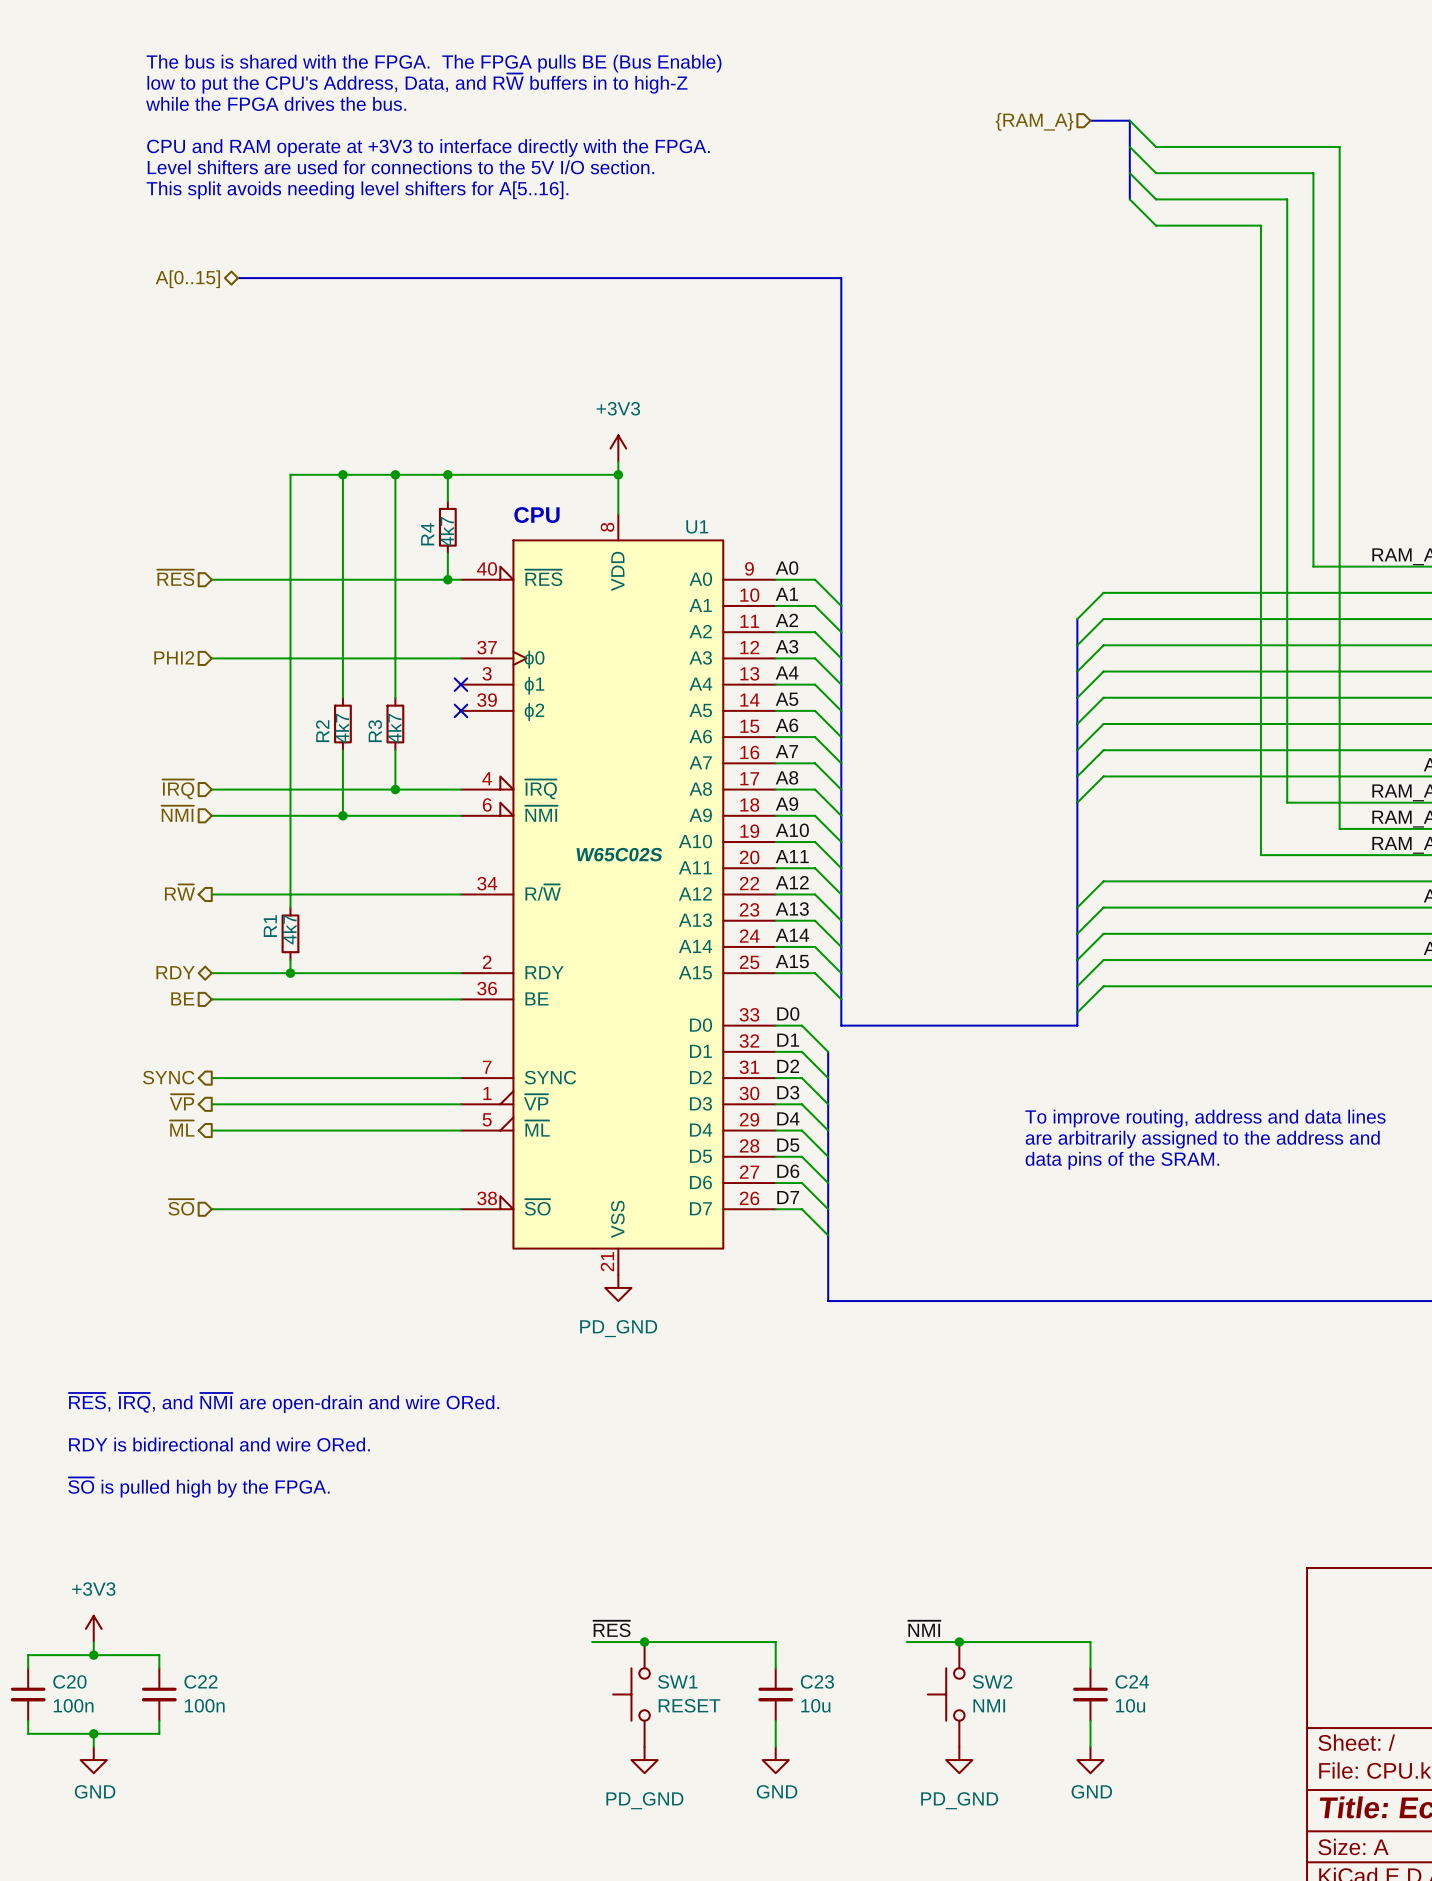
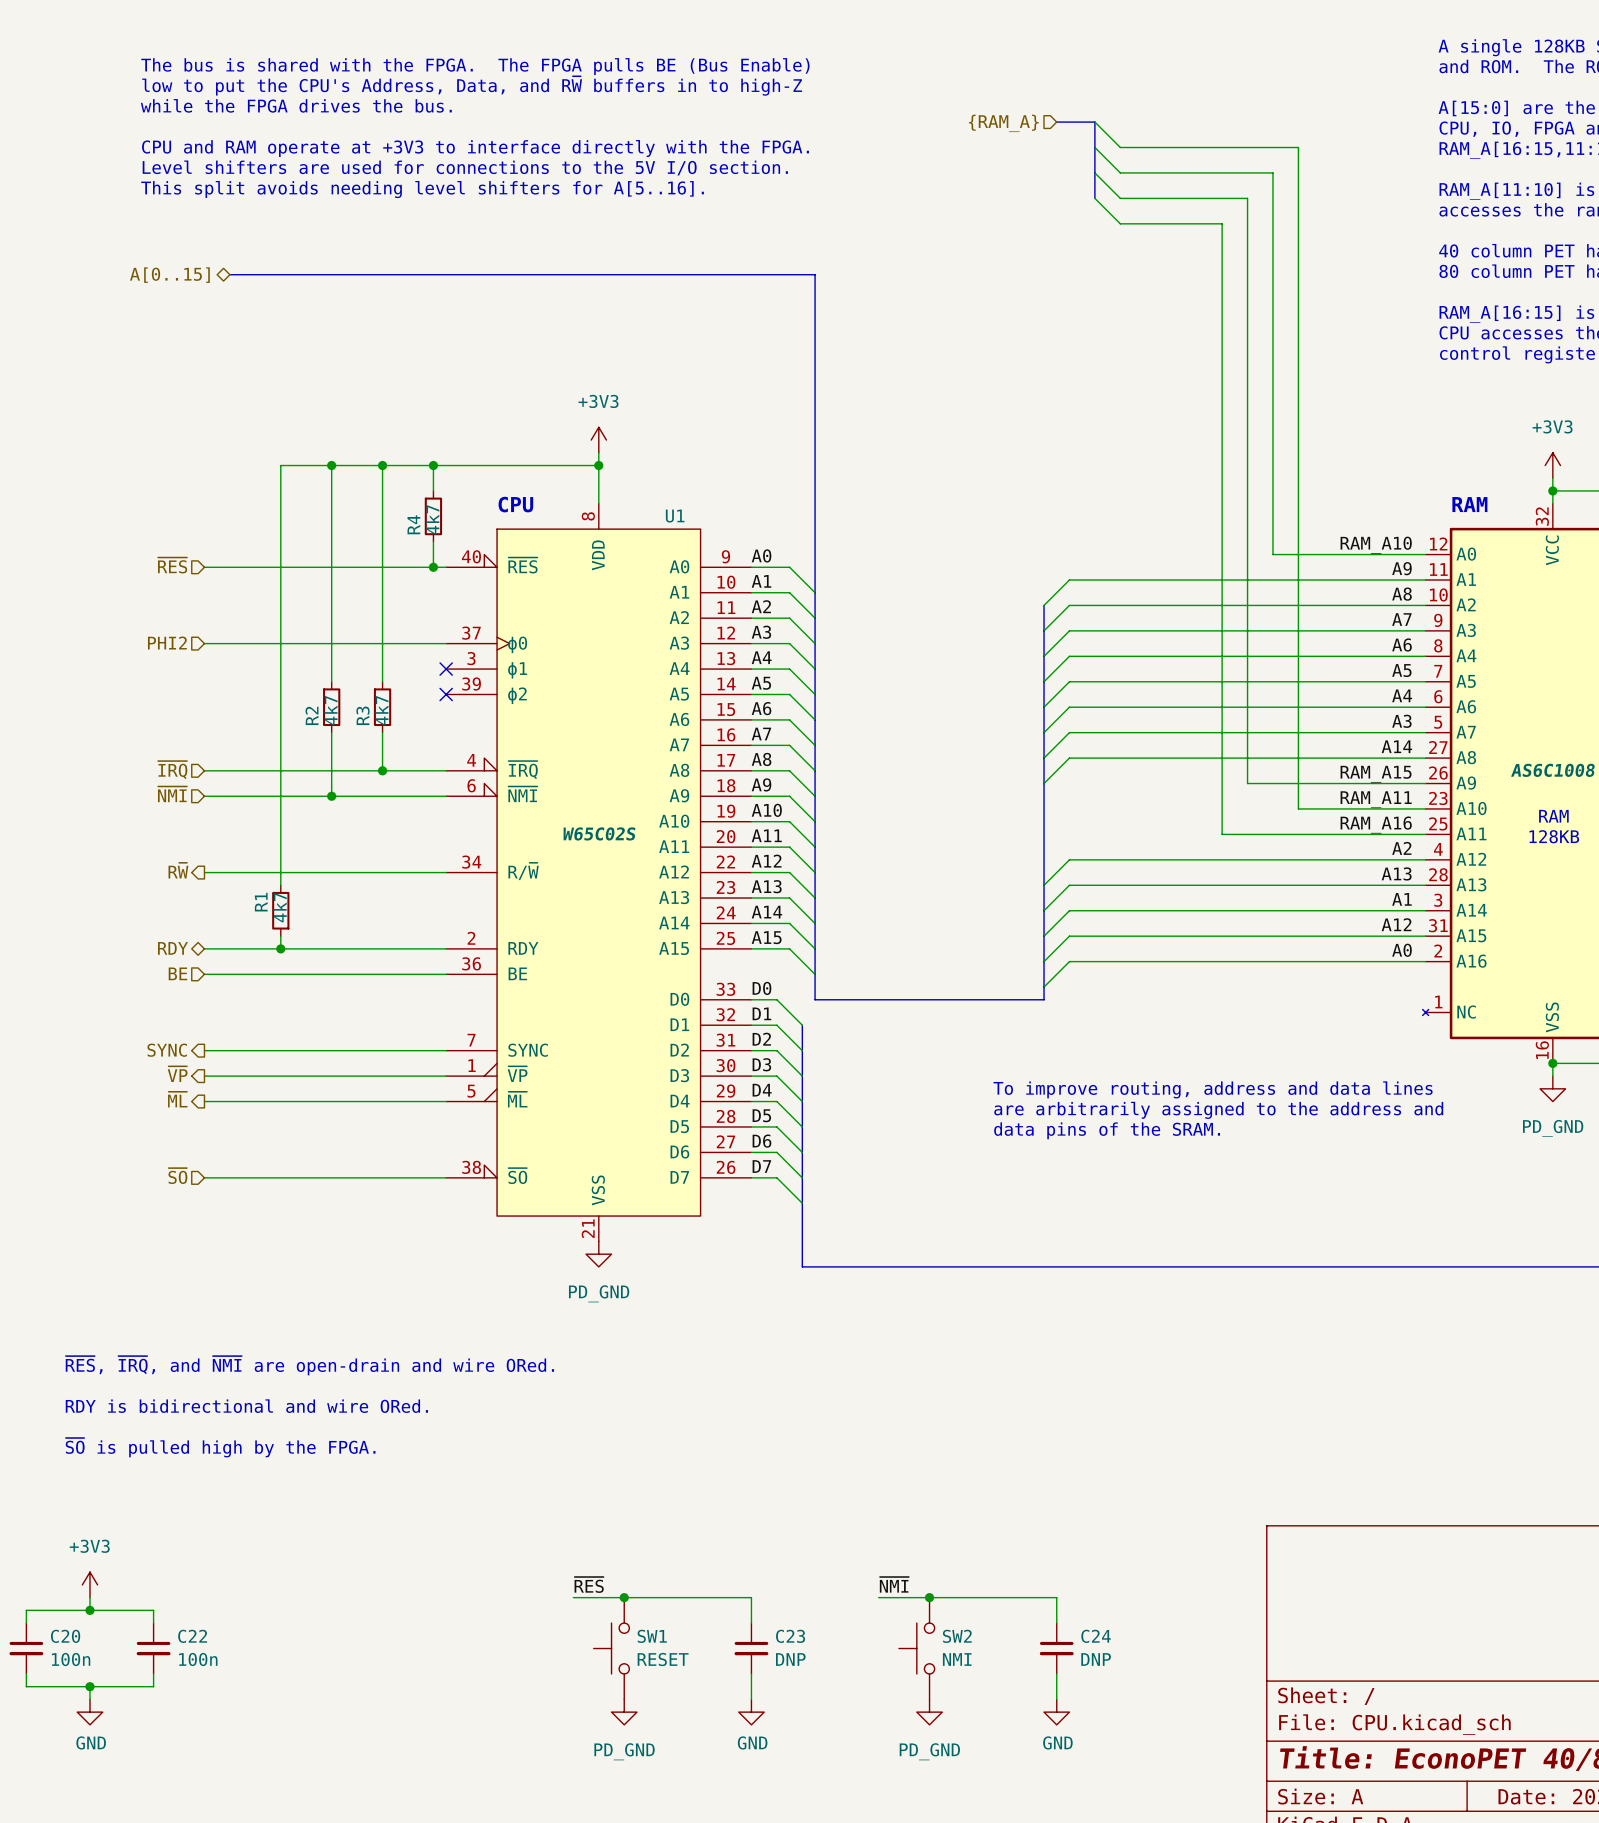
C23 value: 10u (815, 1705) -> DNP (790, 1659)
C24 value: 10u (1130, 1705) -> DNP (1096, 1659)

